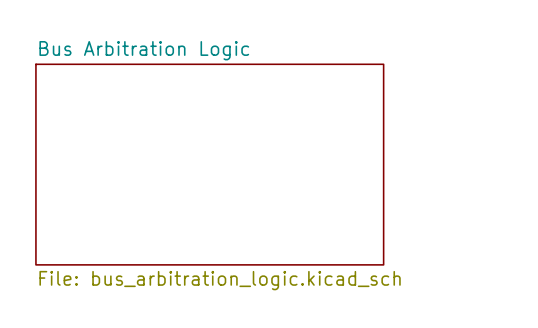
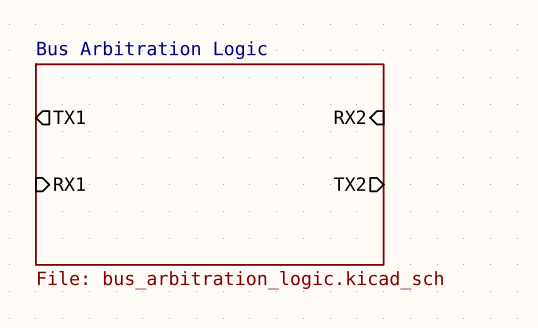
sheet pin: none -> TX1 (69, 117)
sheet pin: none -> RX2 (349, 117)
sheet pin: none -> RX1 (69, 184)
sheet pin: none -> TX2 (349, 184)

